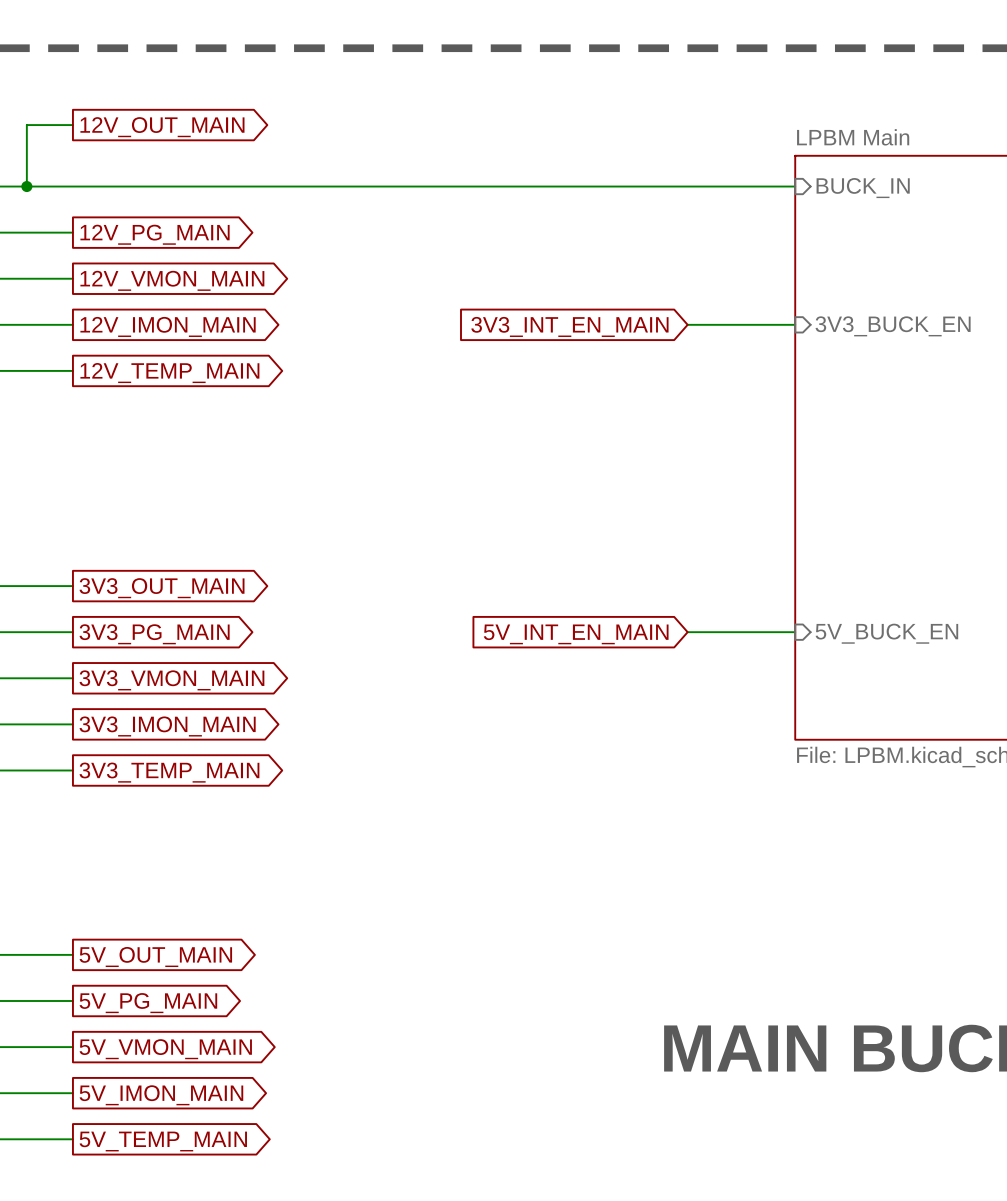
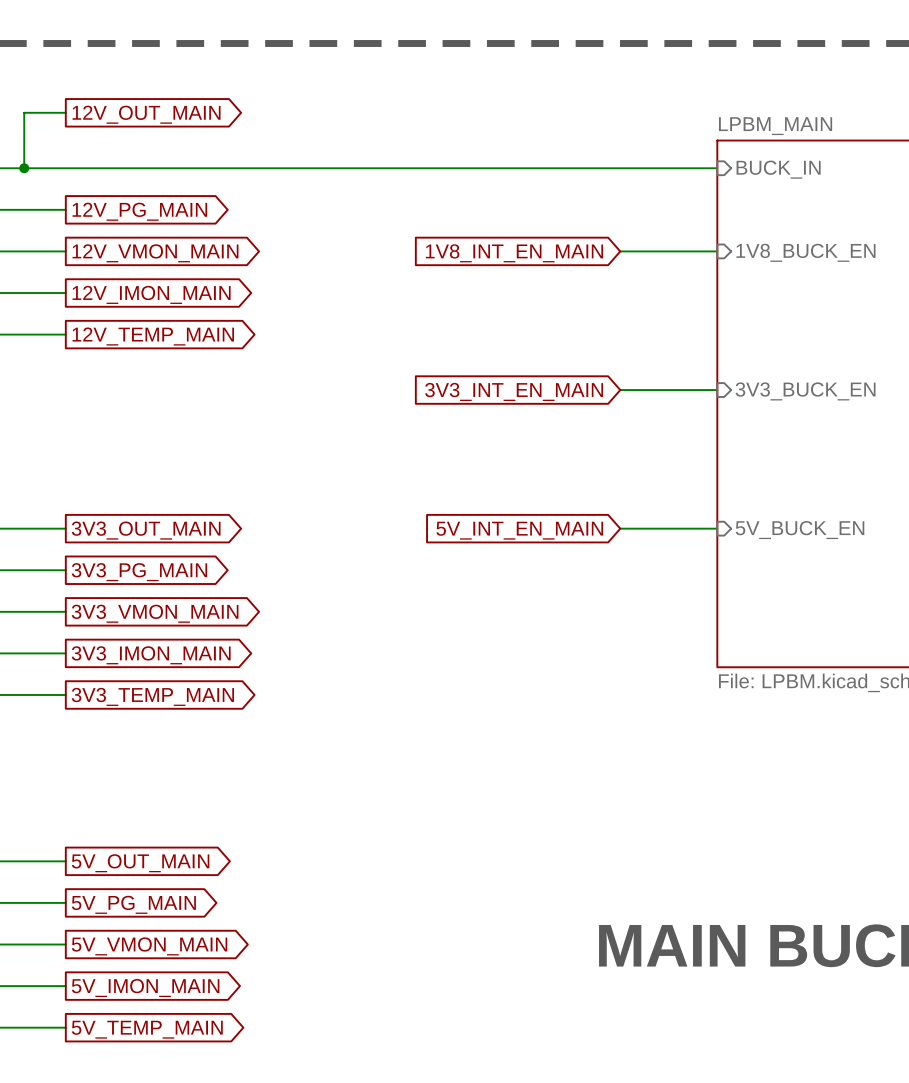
sheet LPBM Main name: LPBM Main (853, 137) -> LPBM_MAIN (775, 126)
global label: none -> 1V8_INT_EN_MAIN (514, 253)
sheet pin: none -> 1V8_BUCK_EN (805, 252)
wire: (687, 324) (795, 324) -> (620, 251) (717, 251)
global label position: 3V3_INT_EN_MAIN (569, 326) -> 3V3_INT_EN_MAIN (514, 391)
sheet pin position: 3V3_BUCK_EN (893, 326) -> 3V3_BUCK_EN (805, 391)
wire: none -> (620, 390) (717, 390)
wire: (687, 632) (795, 632) -> (620, 528) (717, 528)
sheet pin position: 5V_BUCK_EN (886, 633) -> 5V_BUCK_EN (800, 530)
global label position: 5V_INT_EN_MAIN (576, 634) -> 5V_INT_EN_MAIN (519, 530)

